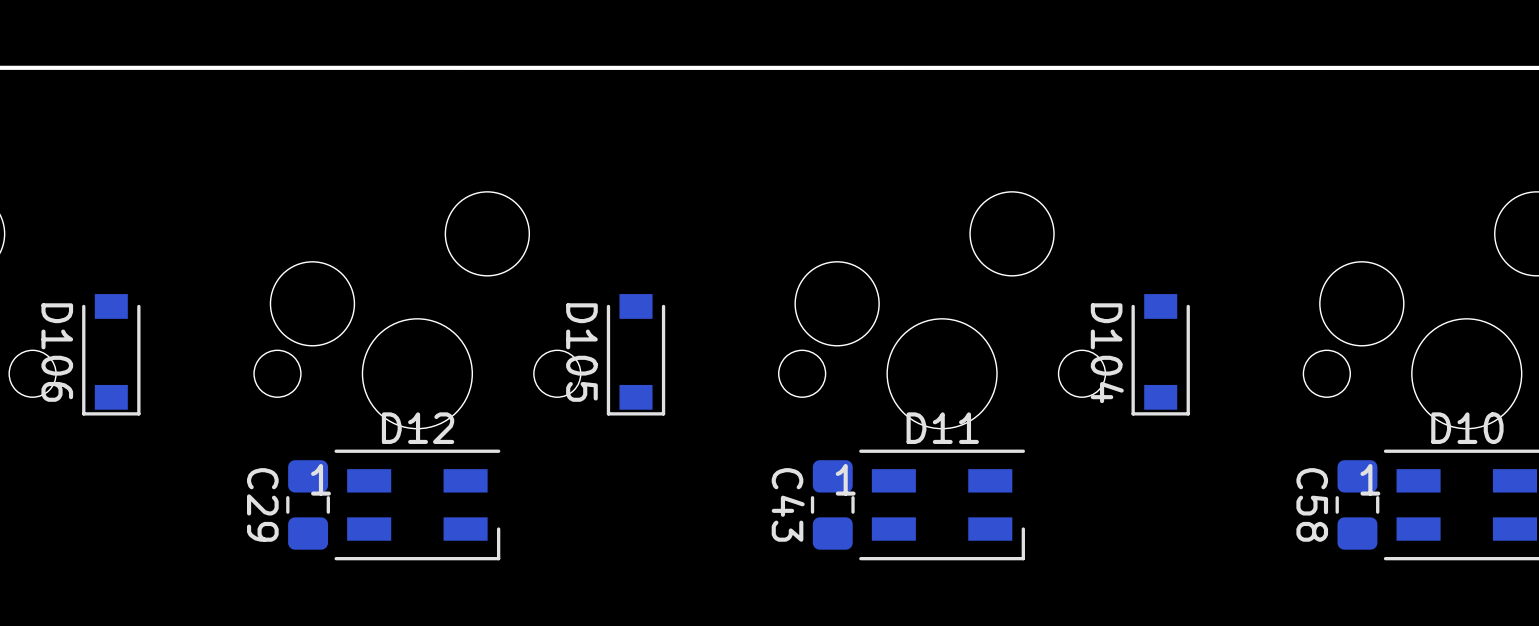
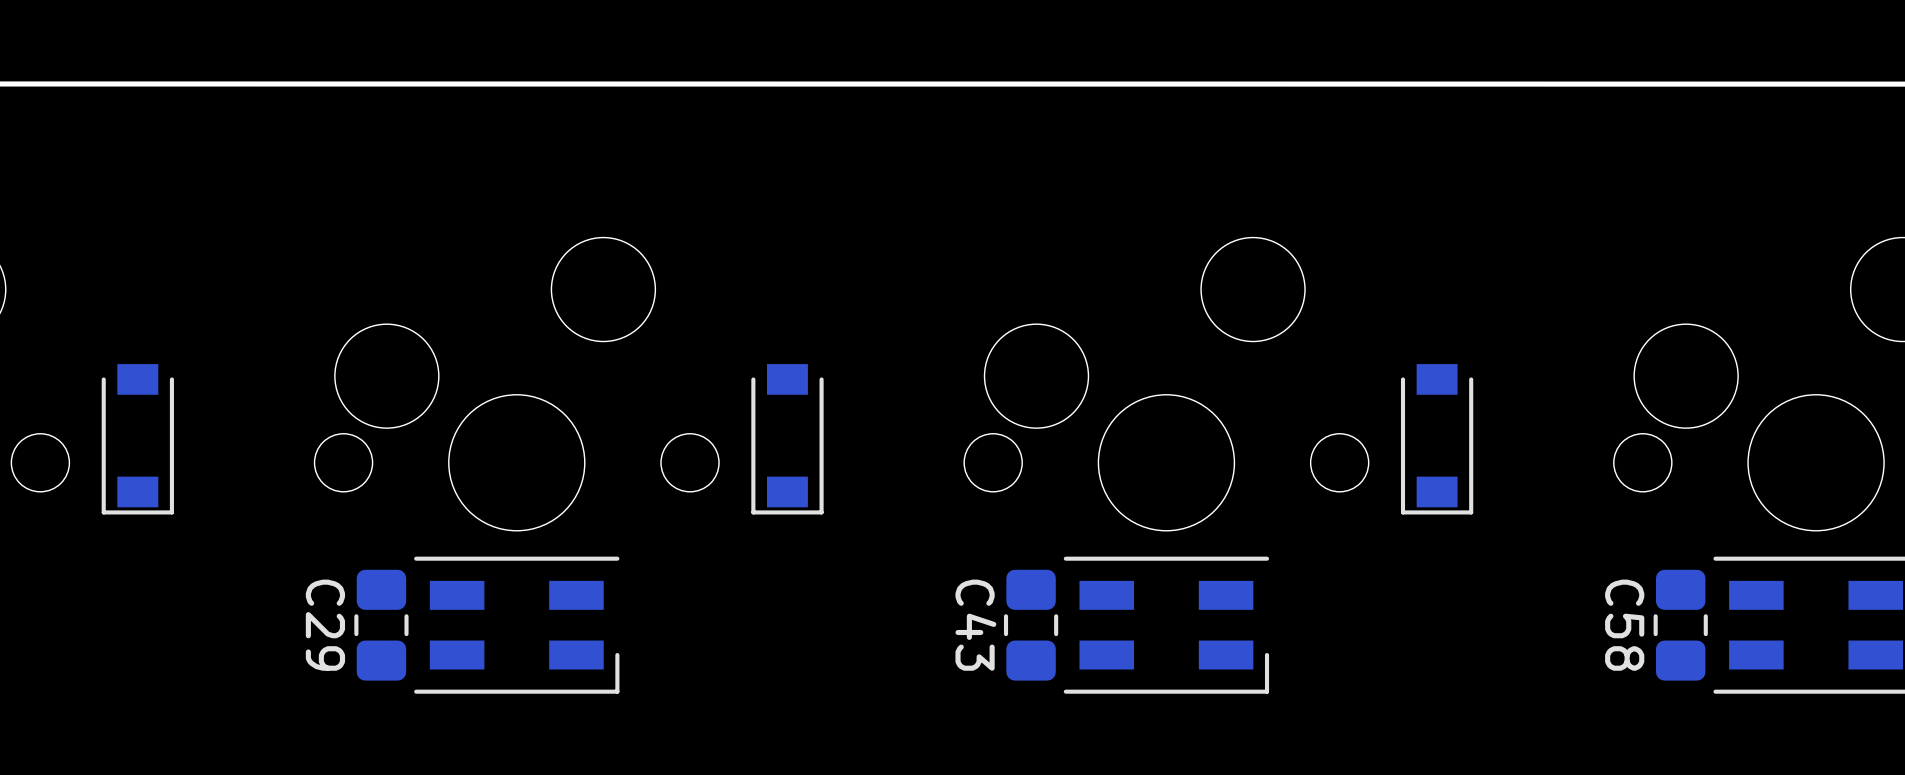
D106 name: D106 (57, 352) -> none
D105 name: D105 (581, 352) -> none
D104 name: D104 (1107, 353) -> none
D12 name: D12 (418, 428) -> none
D11 name: D11 (942, 428) -> none
D10 name: D10 (1467, 428) -> none
D12 text: 1 (320, 479) -> none
D11 text: 1 (845, 479) -> none
D10 text: 1 (1370, 479) -> none

